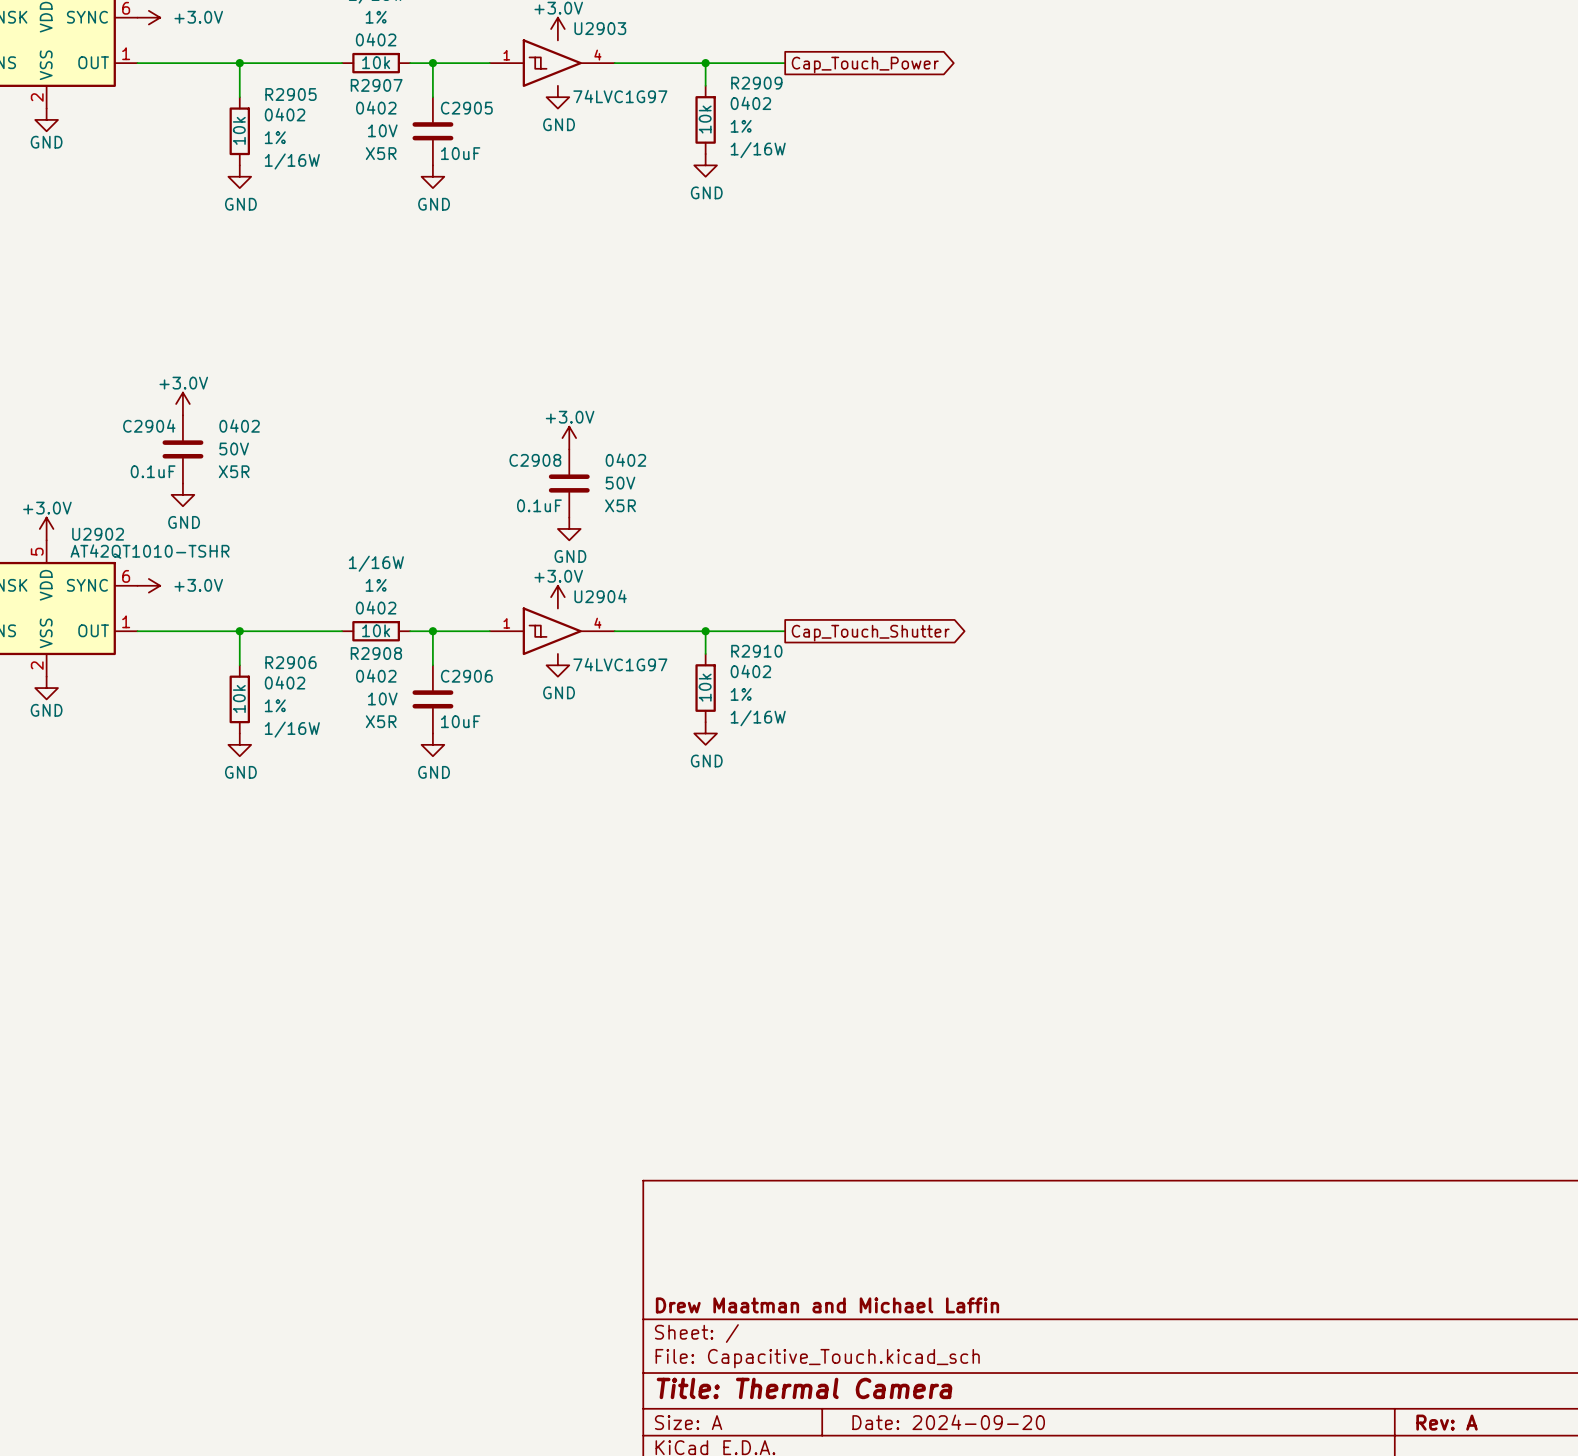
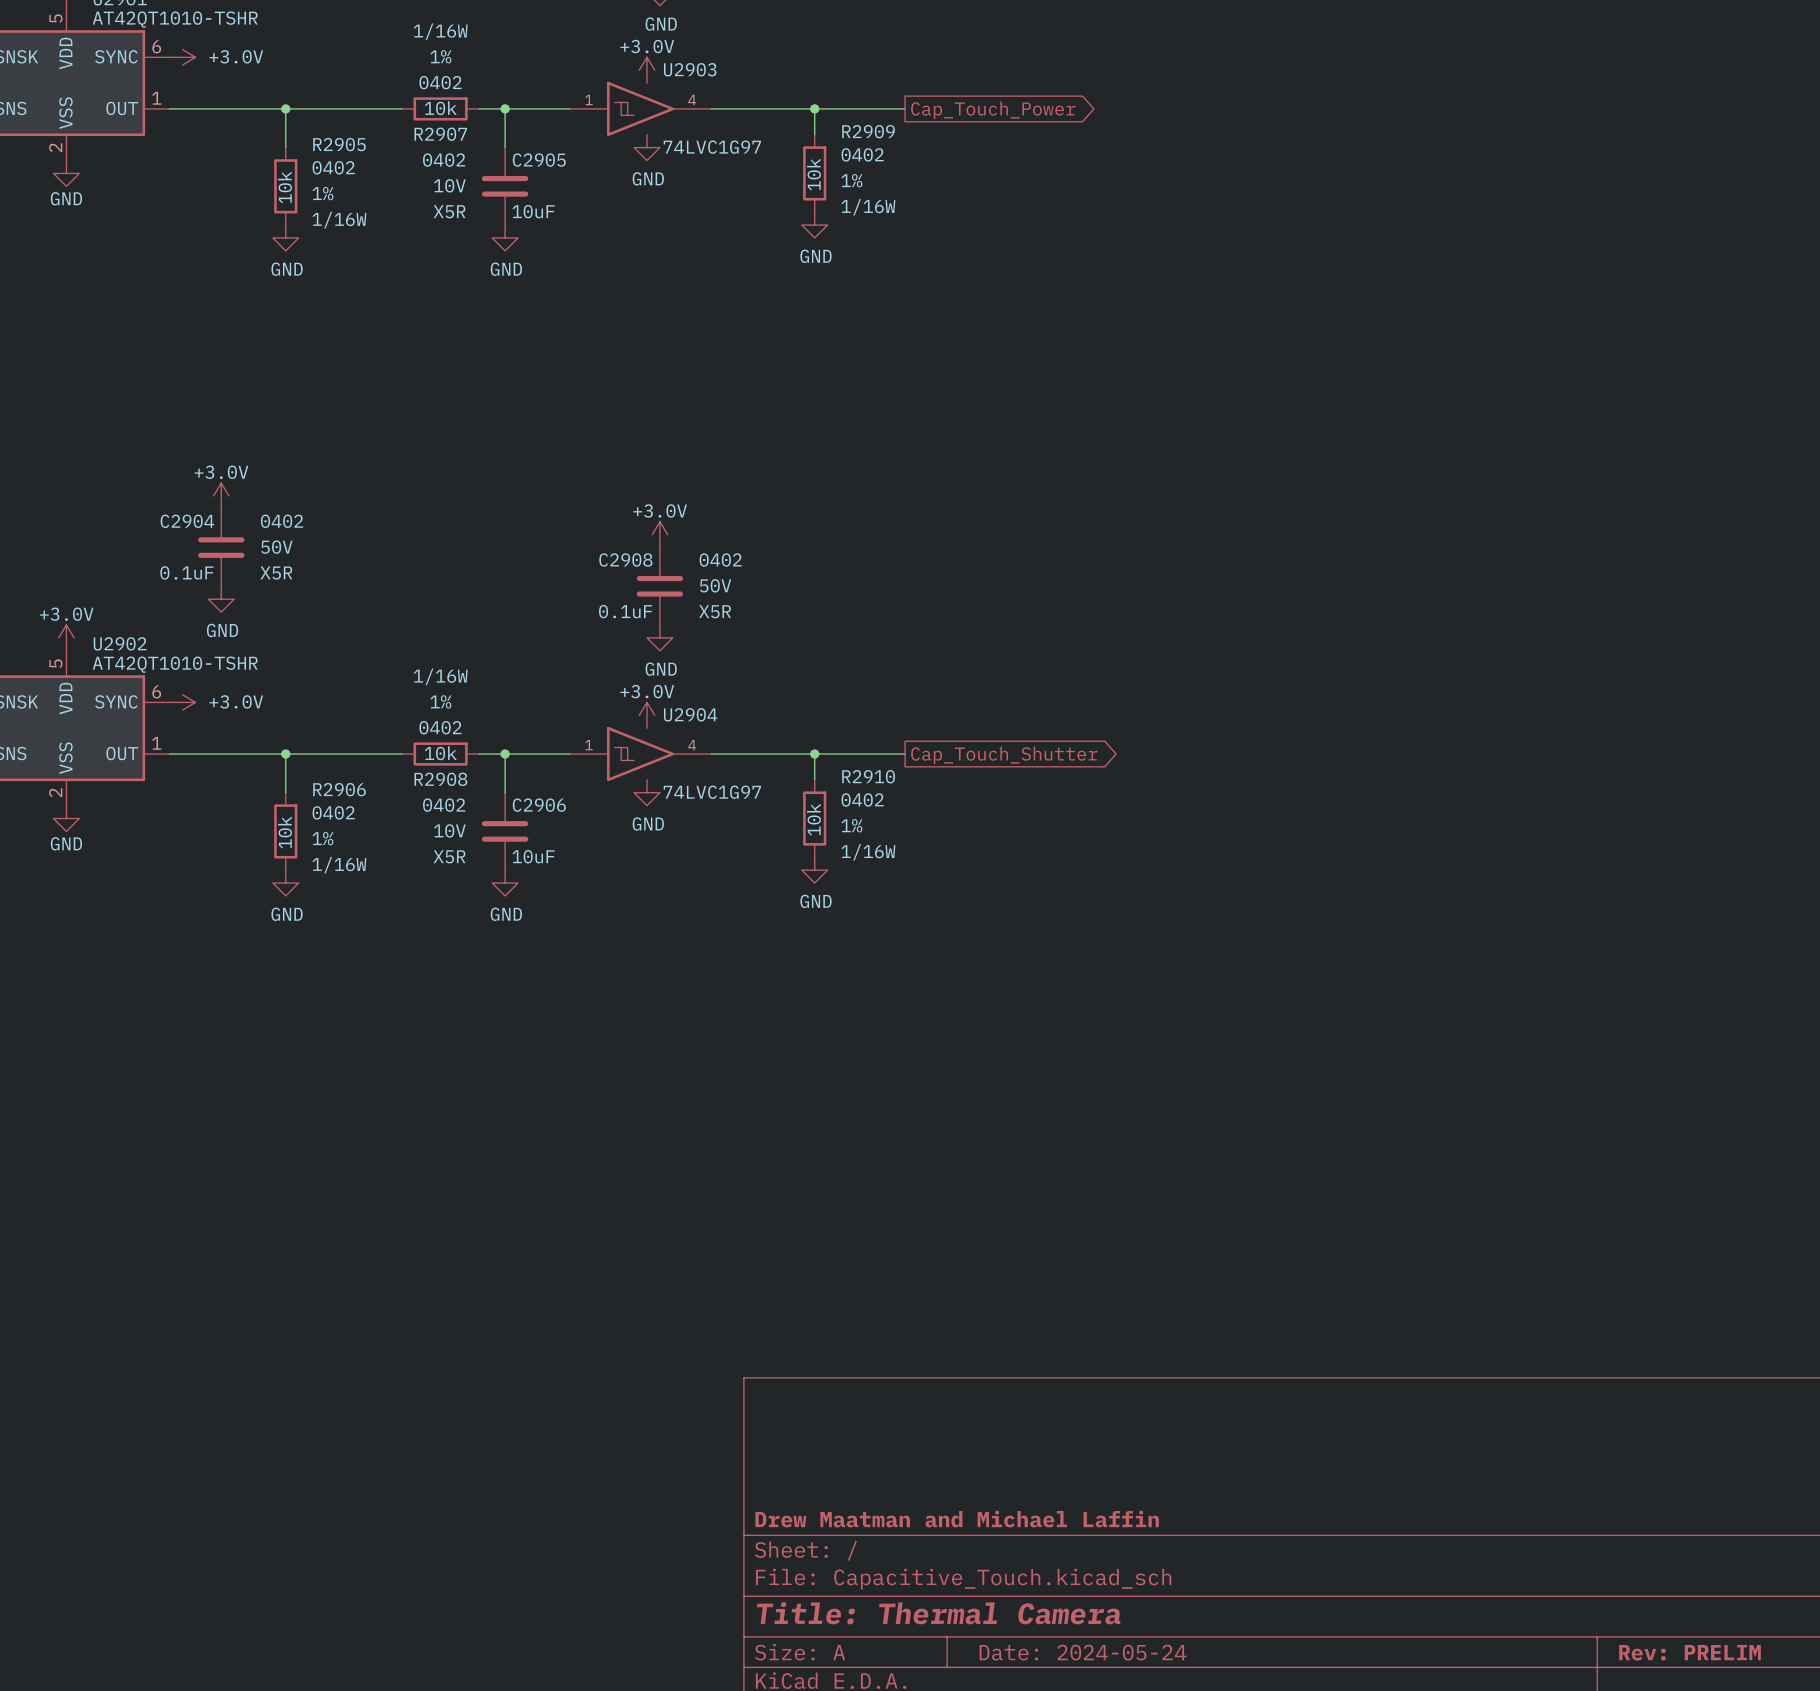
title block: Date: 2024-09-20 (948, 1422) -> Date: 2024-05-24 (1082, 1652)
title block: Rev: A (1447, 1422) -> Rev: PRELIM (1690, 1652)

